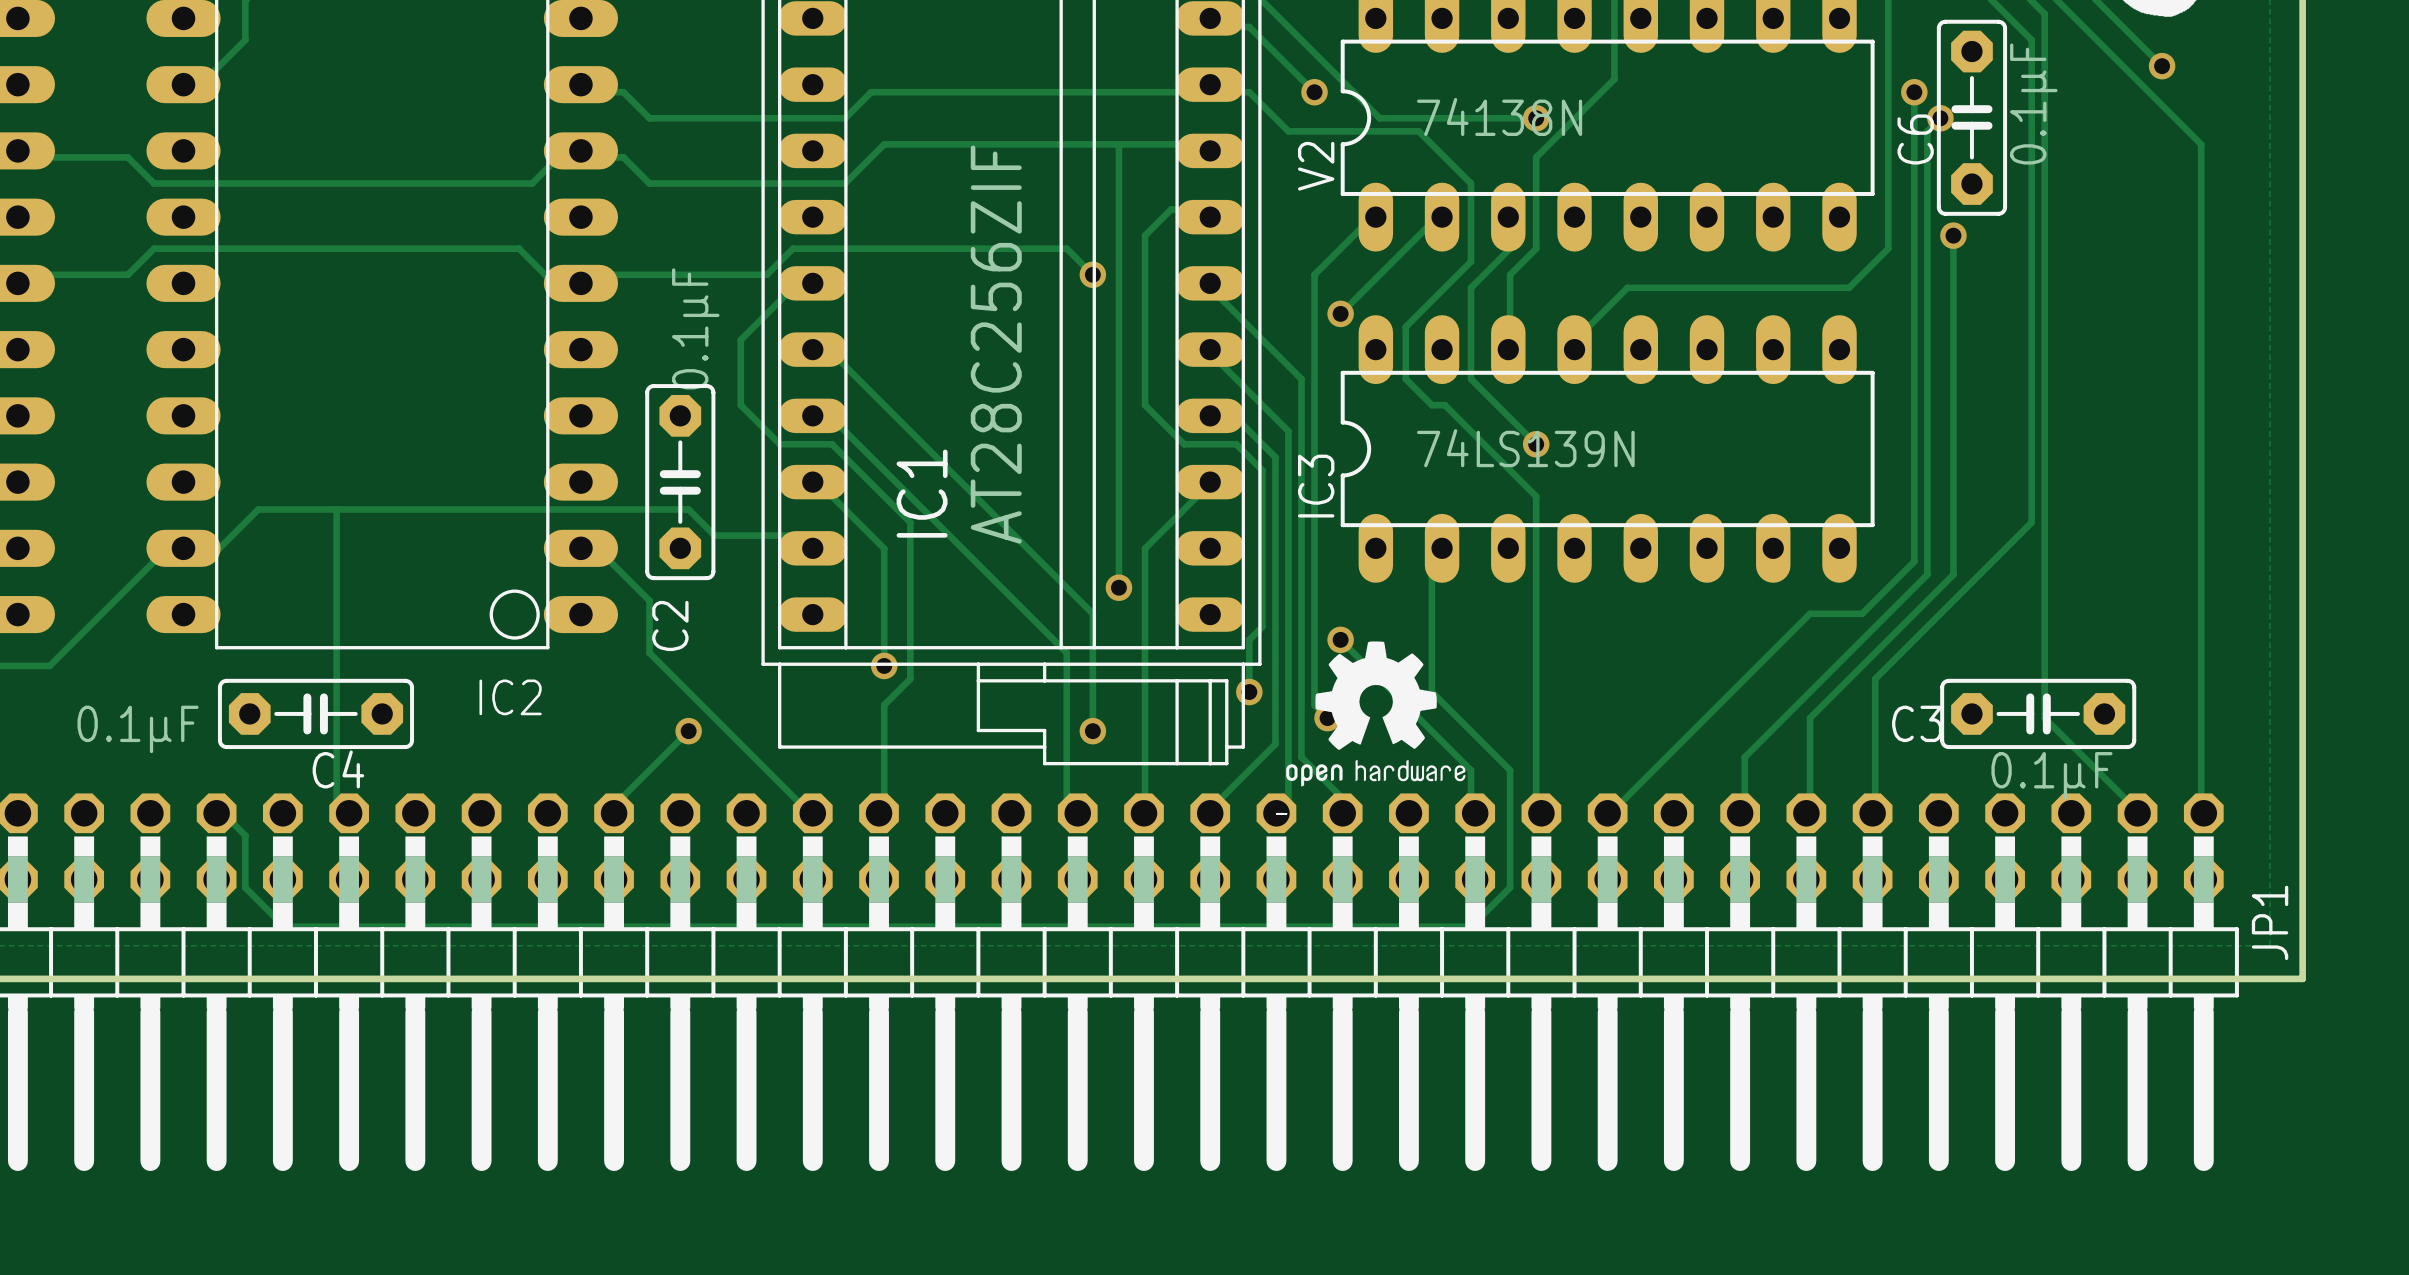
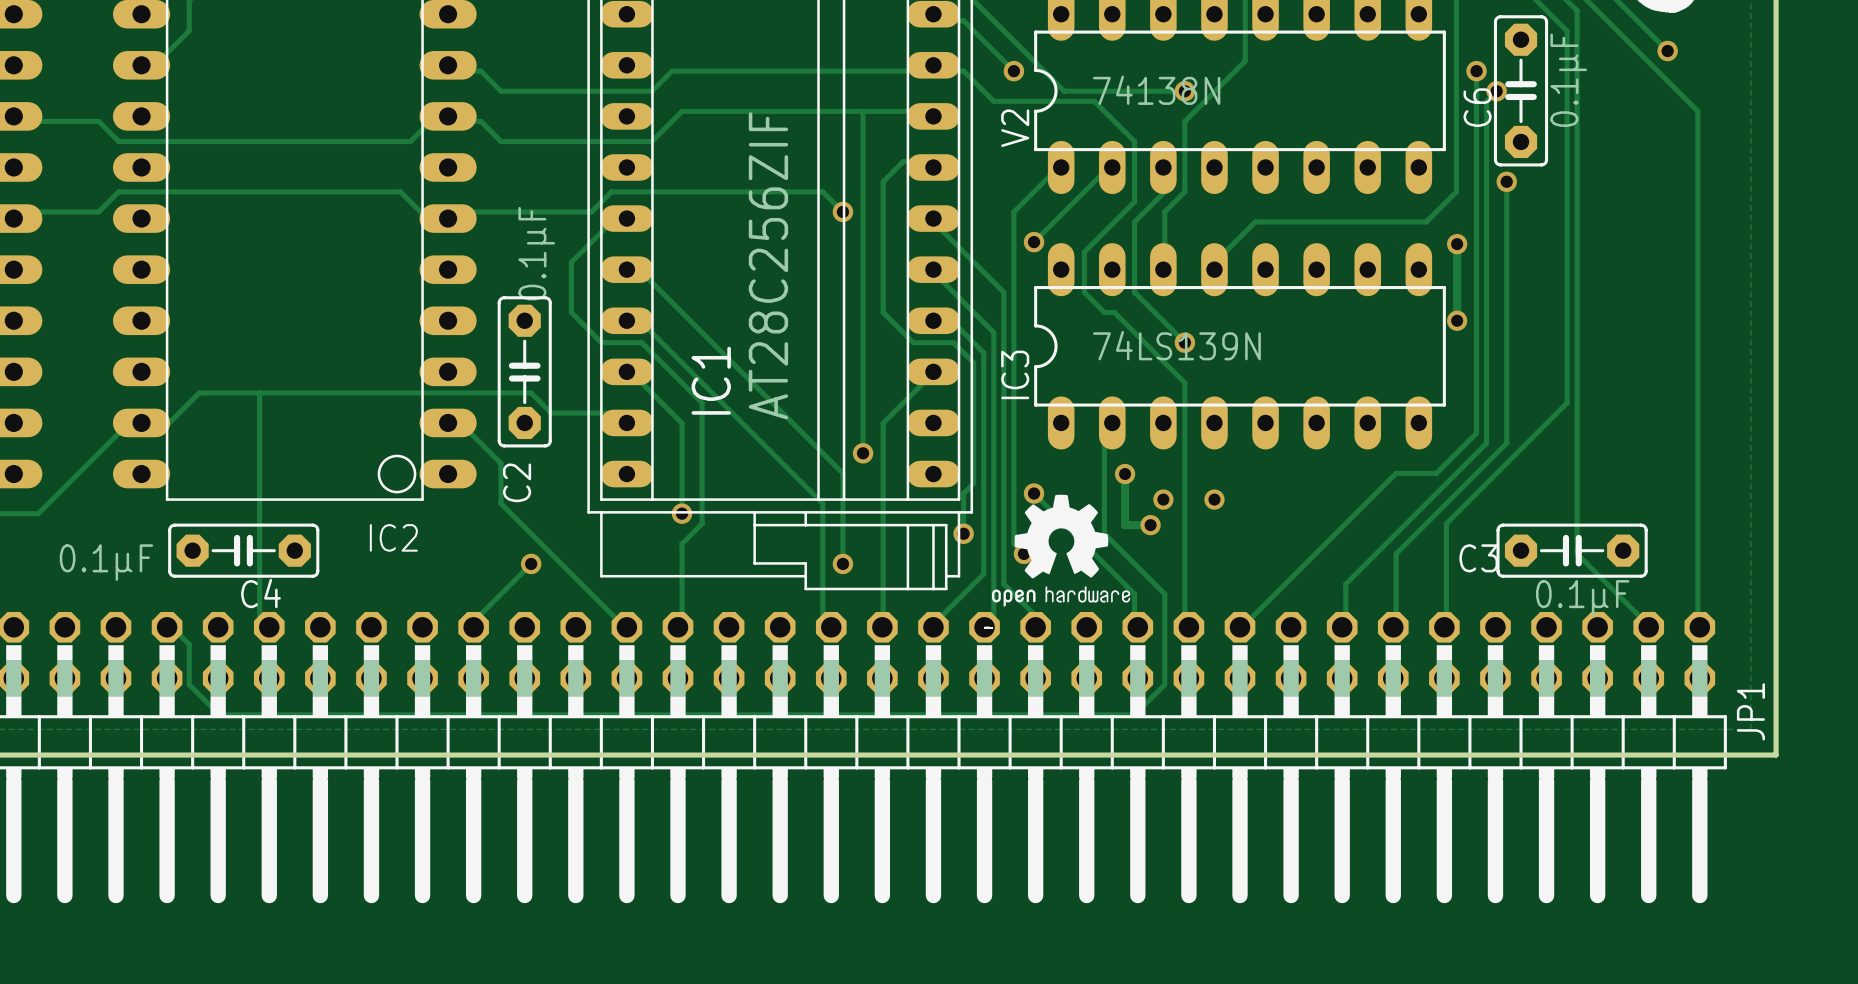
track: none -> (1457, 244) (1457, 320)
via: none -> (1457, 244)
via: none -> (1457, 320)
track: none -> (1125, 474) (1125, 525) (1150, 525)
via: none -> (1125, 474)
via: none -> (1163, 499)
via: none -> (1214, 499)
via: none -> (1150, 525)

